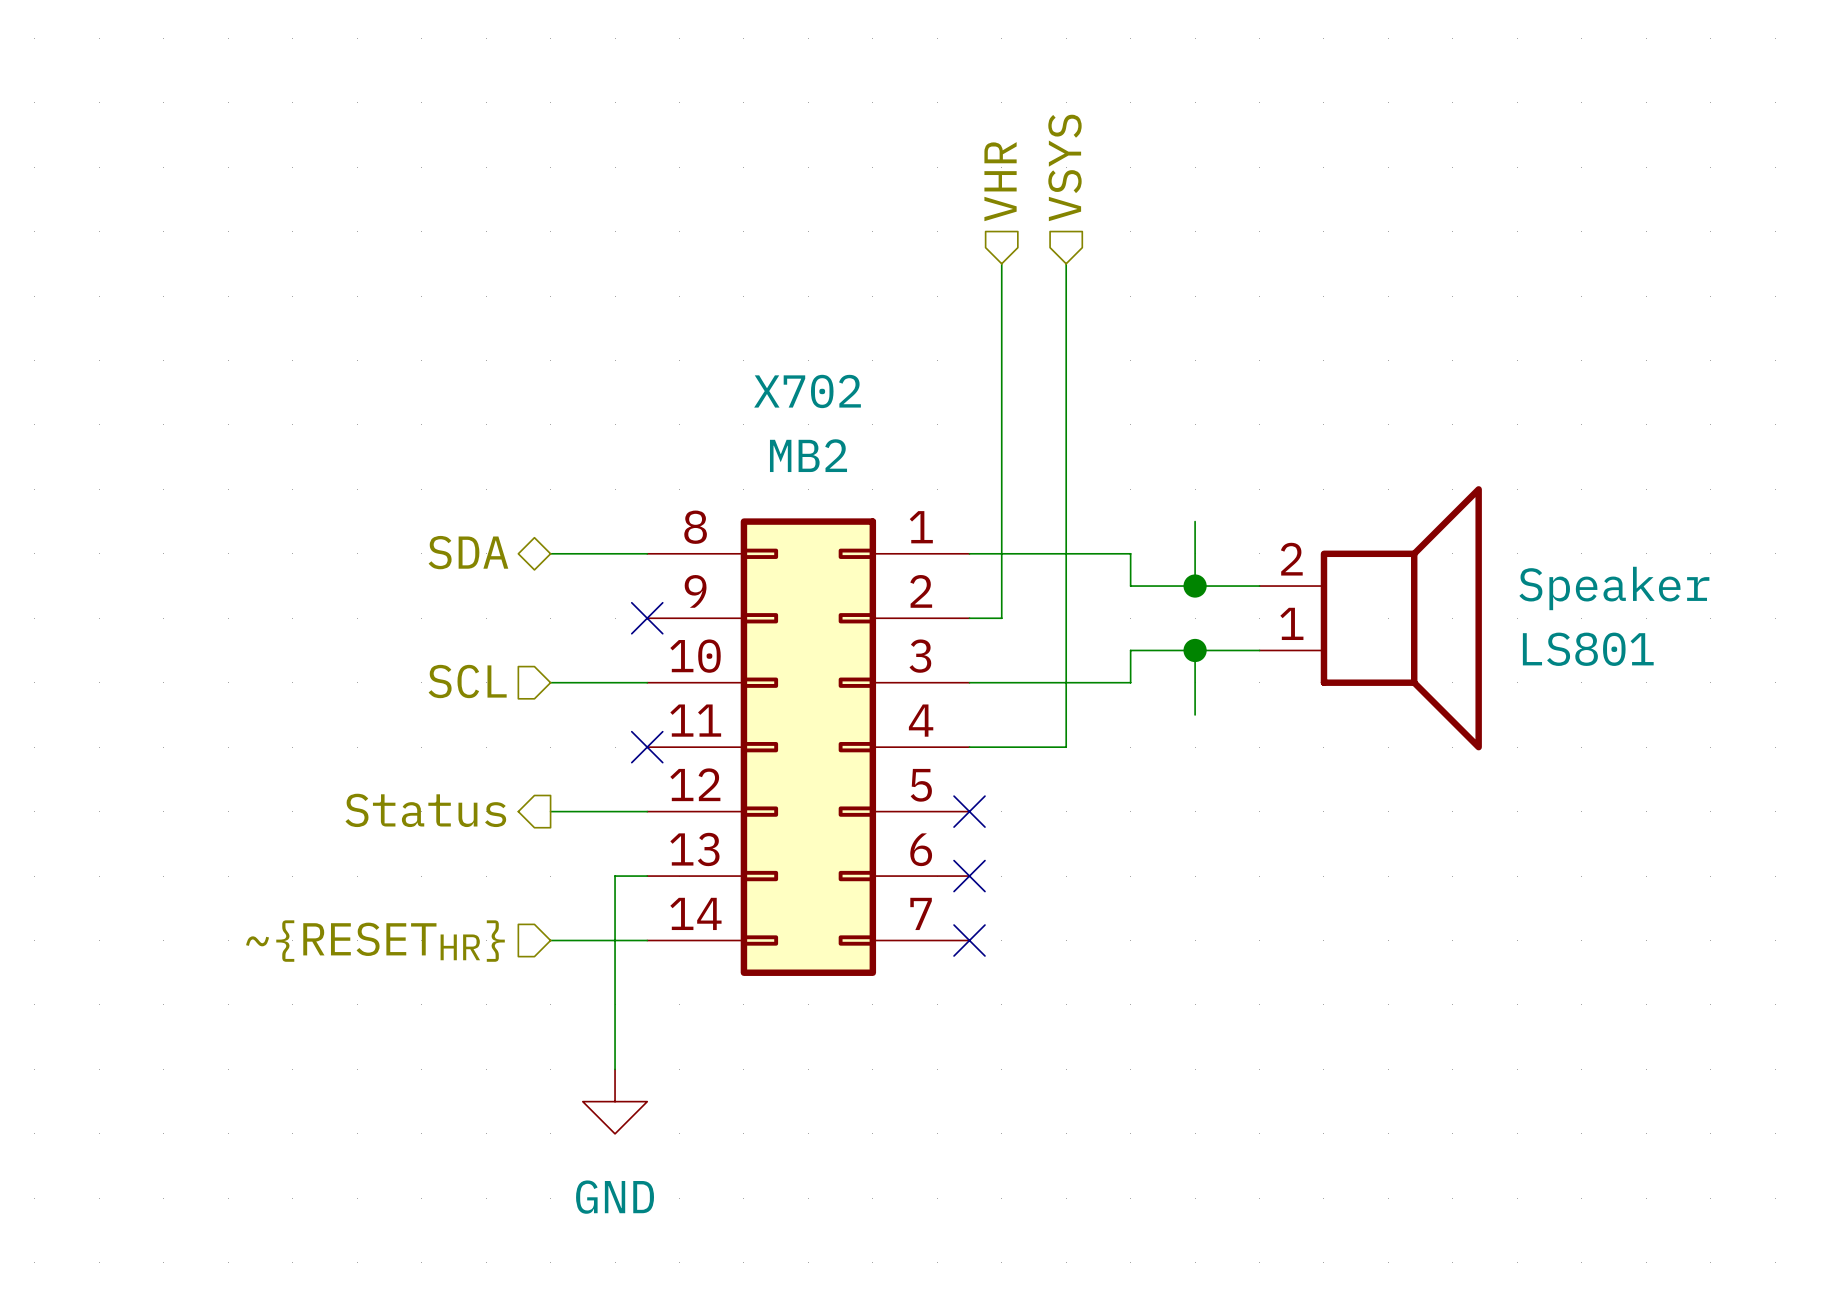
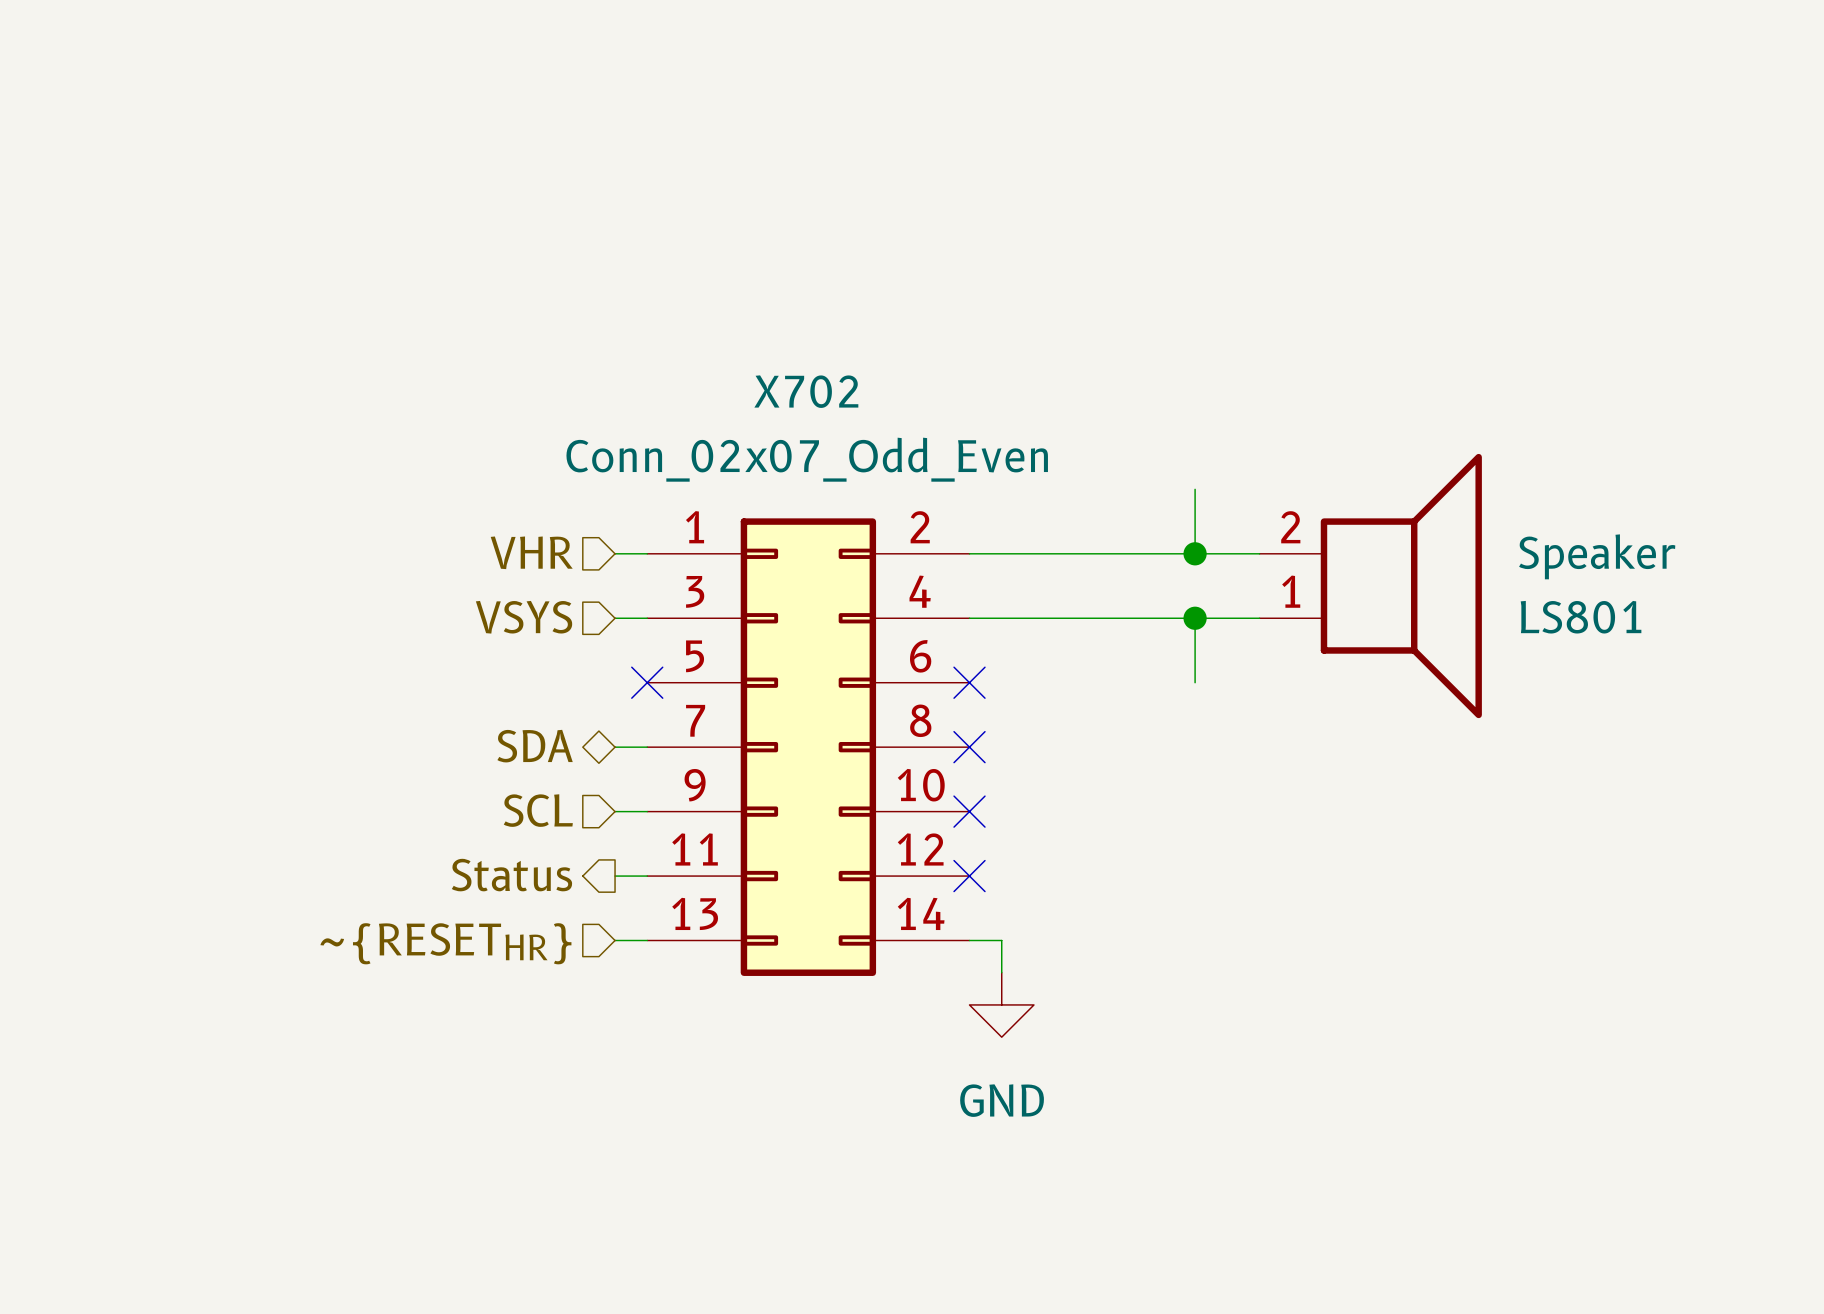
hierarchical label rotation: 0° (1064, 167) -> 90° counterclockwise (524, 617)
hierarchical label position: VSYS (1064, 167) -> VSYS (524, 617)
hierarchical label rotation: 0° (1000, 181) -> 90° counterclockwise (531, 552)
hierarchical label position: VHR (1000, 181) -> VHR (531, 552)
wire: (1001, 263) (1001, 618) -> (1259, 618) (1001, 618)
wire: (1066, 263) (1066, 747) (969, 747) -> none
X702 value: MB2 (808, 455) -> Conn_02x07_Odd_Even (807, 459)
X702 symbol: [647, 518, 970, 976] -> [647, 518, 970, 976]
hierarchical label position: SDA (468, 552) -> SDA (535, 746)
wire: (550, 553) (615, 553) -> none
wire: (1130, 553) (1130, 586) (1259, 586) -> (1130, 553) (1259, 553)
wire: (1195, 553) (1195, 586) -> (1195, 489) (1195, 521)
junction: none -> (1195, 553)
junction: (1195, 586) -> none
wire: none -> (615, 618) (647, 618)
no-connect mark: (647, 618) -> none
junction: none -> (1195, 618)
LS801 position: (1370, 618) -> (1370, 586)
junction: (1195, 650) -> none
wire: (1259, 650) (1130, 650) (1130, 682) (969, 682) -> none
hierarchical label position: SCL (467, 681) -> SCL (538, 810)
wire: (550, 682) (647, 682) -> none
no-connect mark: none -> (647, 682)
no-connect mark: none -> (969, 682)
wire: (1195, 682) (1195, 714) -> (1195, 618) (1195, 650)
wire: none -> (615, 747) (647, 747)
no-connect mark: (647, 747) -> none
no-connect mark: none -> (969, 747)
hierarchical label position: Status (425, 810) -> Status (511, 875)
wire: (550, 811) (615, 811) -> none
wire: (615, 876) (615, 1069) -> none
wire: (550, 940) (615, 940) -> none
wire: none -> (969, 940) (1001, 940) (1001, 972)
no-connect mark: (969, 940) -> none
hierarchical label position: ~{RESETHR} (375, 941) -> ~{RESETHR} (445, 943)
power symbol position: GND (615, 1101) -> GND (1001, 1004)

